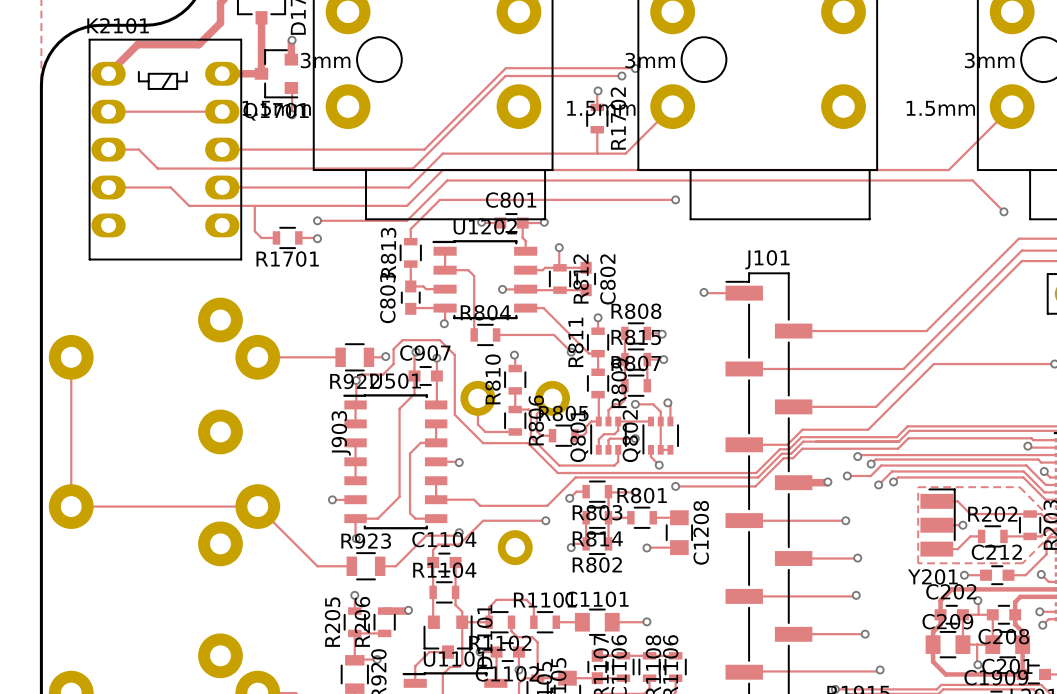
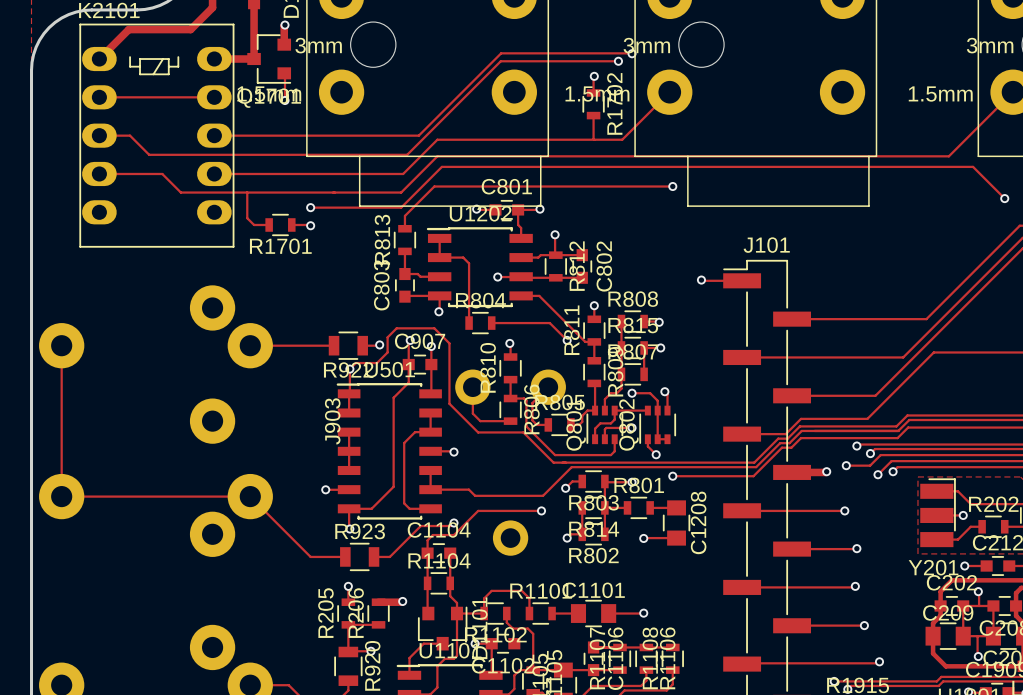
track: (518, 652) (518, 669) -> none
via: (518, 669) -> none

